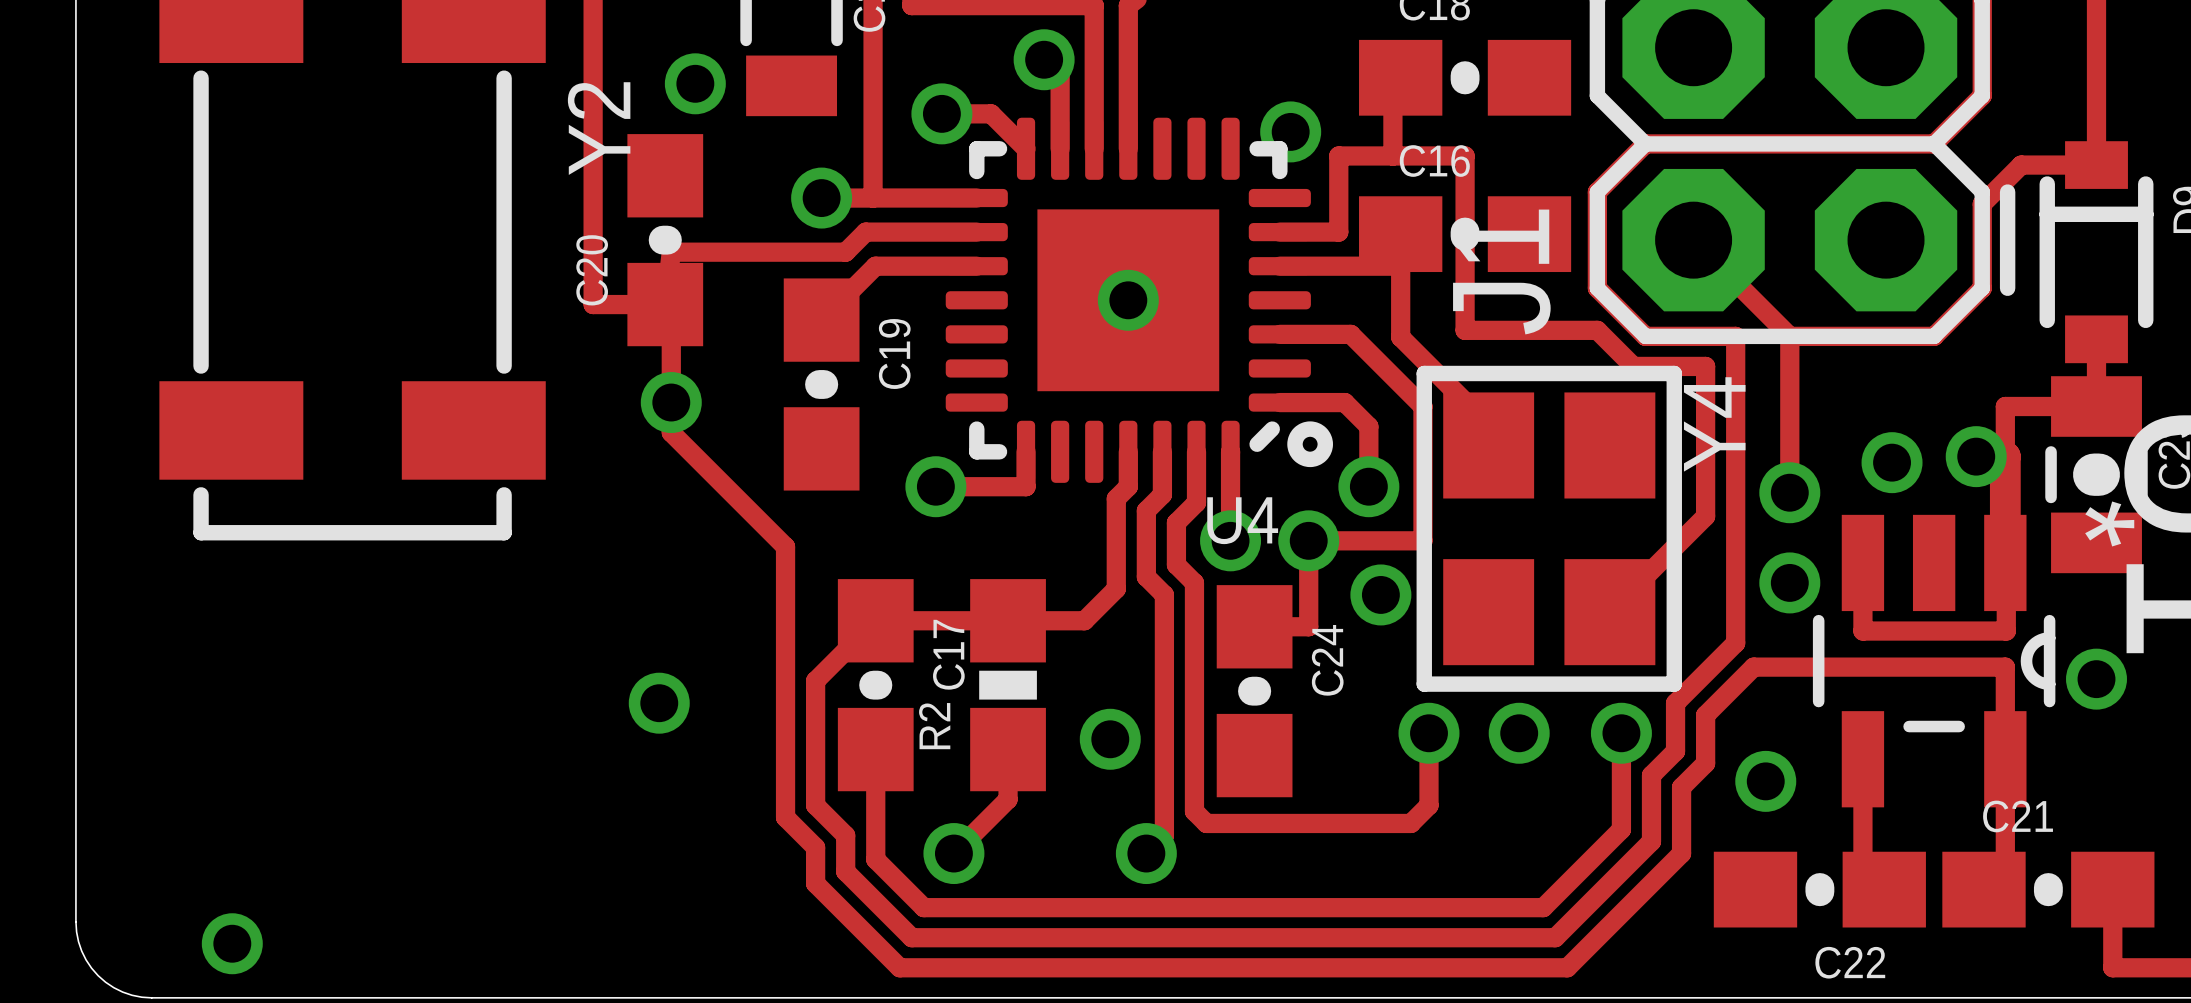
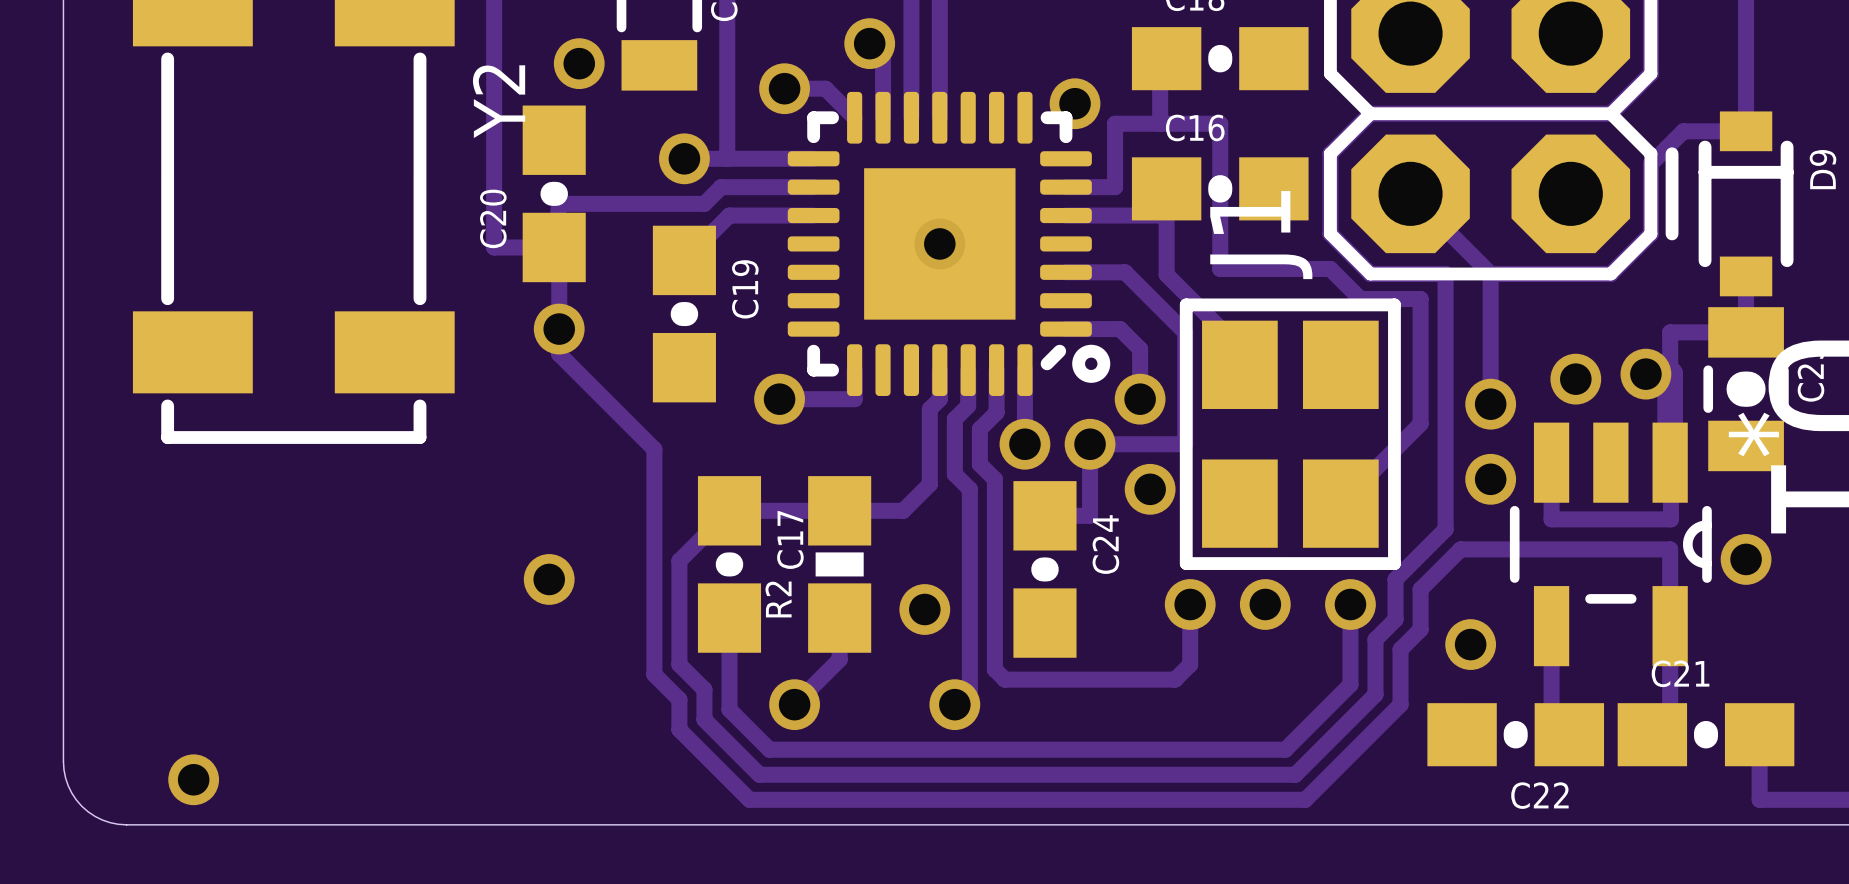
Y4 name: Y4 (1714, 424) -> none
U4 name: U4 (1242, 520) -> none

